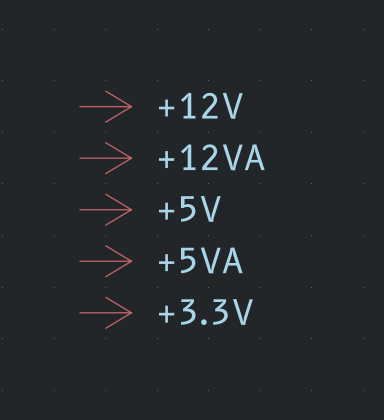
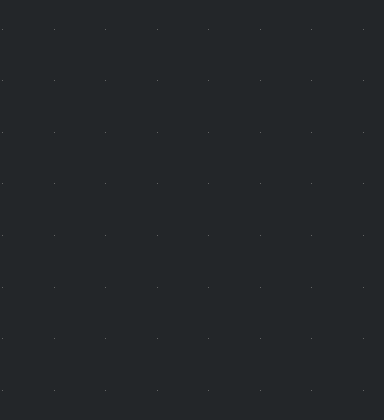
power symbol: +12V (105, 106) -> none
power symbol: +12VA (105, 158) -> none
power symbol: +5V (105, 209) -> none
power symbol: +5VA (105, 261) -> none
power symbol: +3.3V (105, 312) -> none

